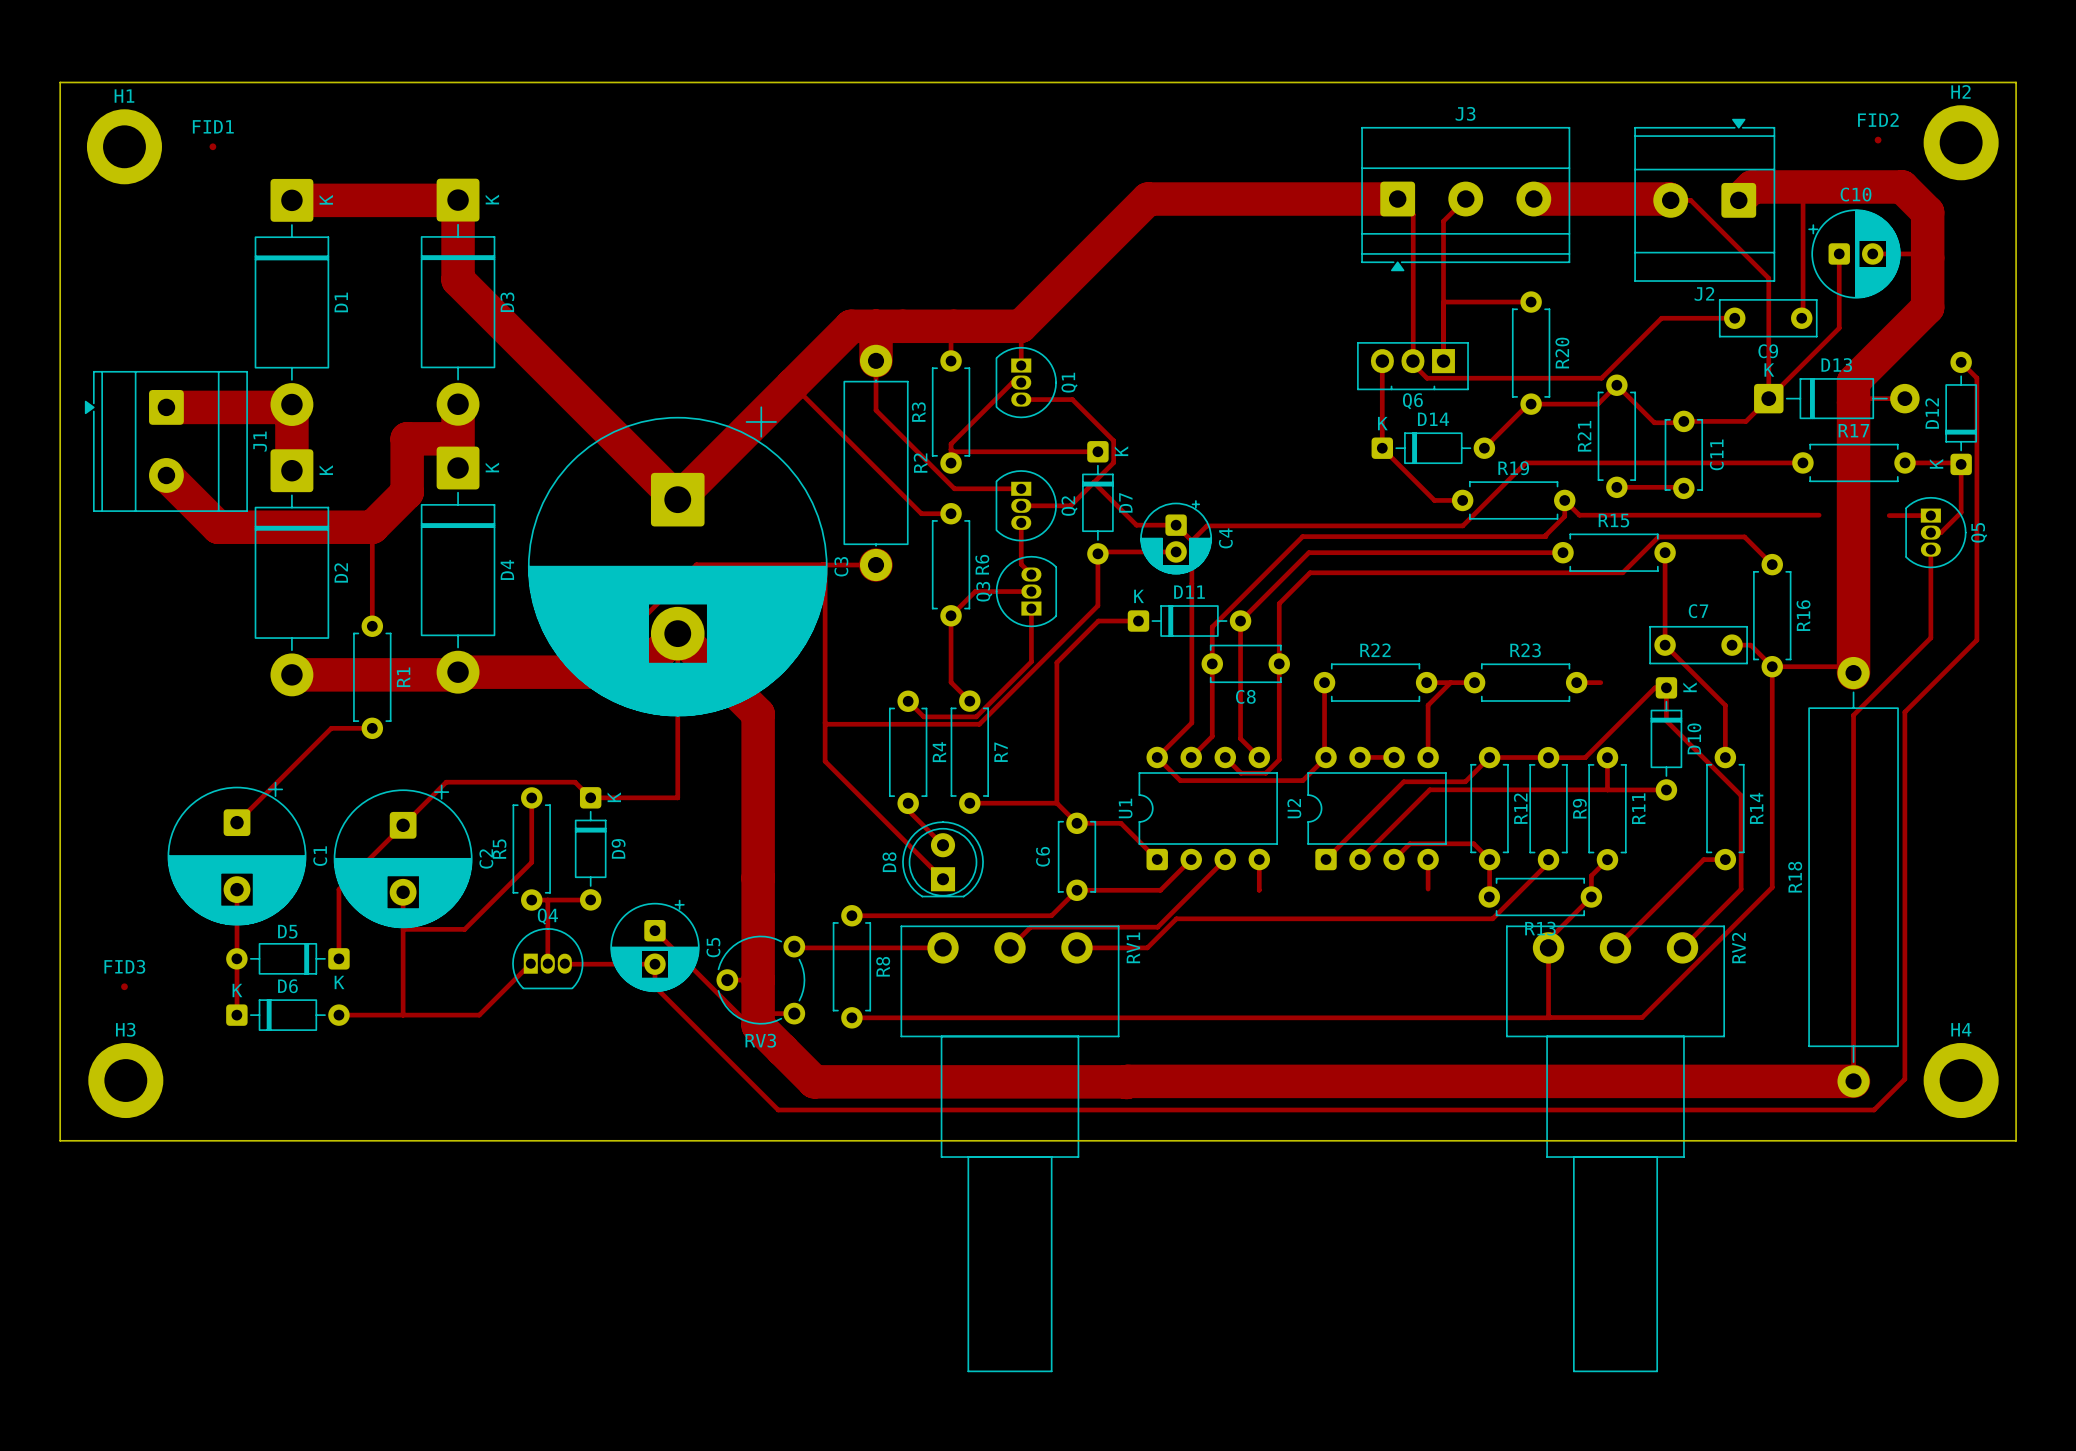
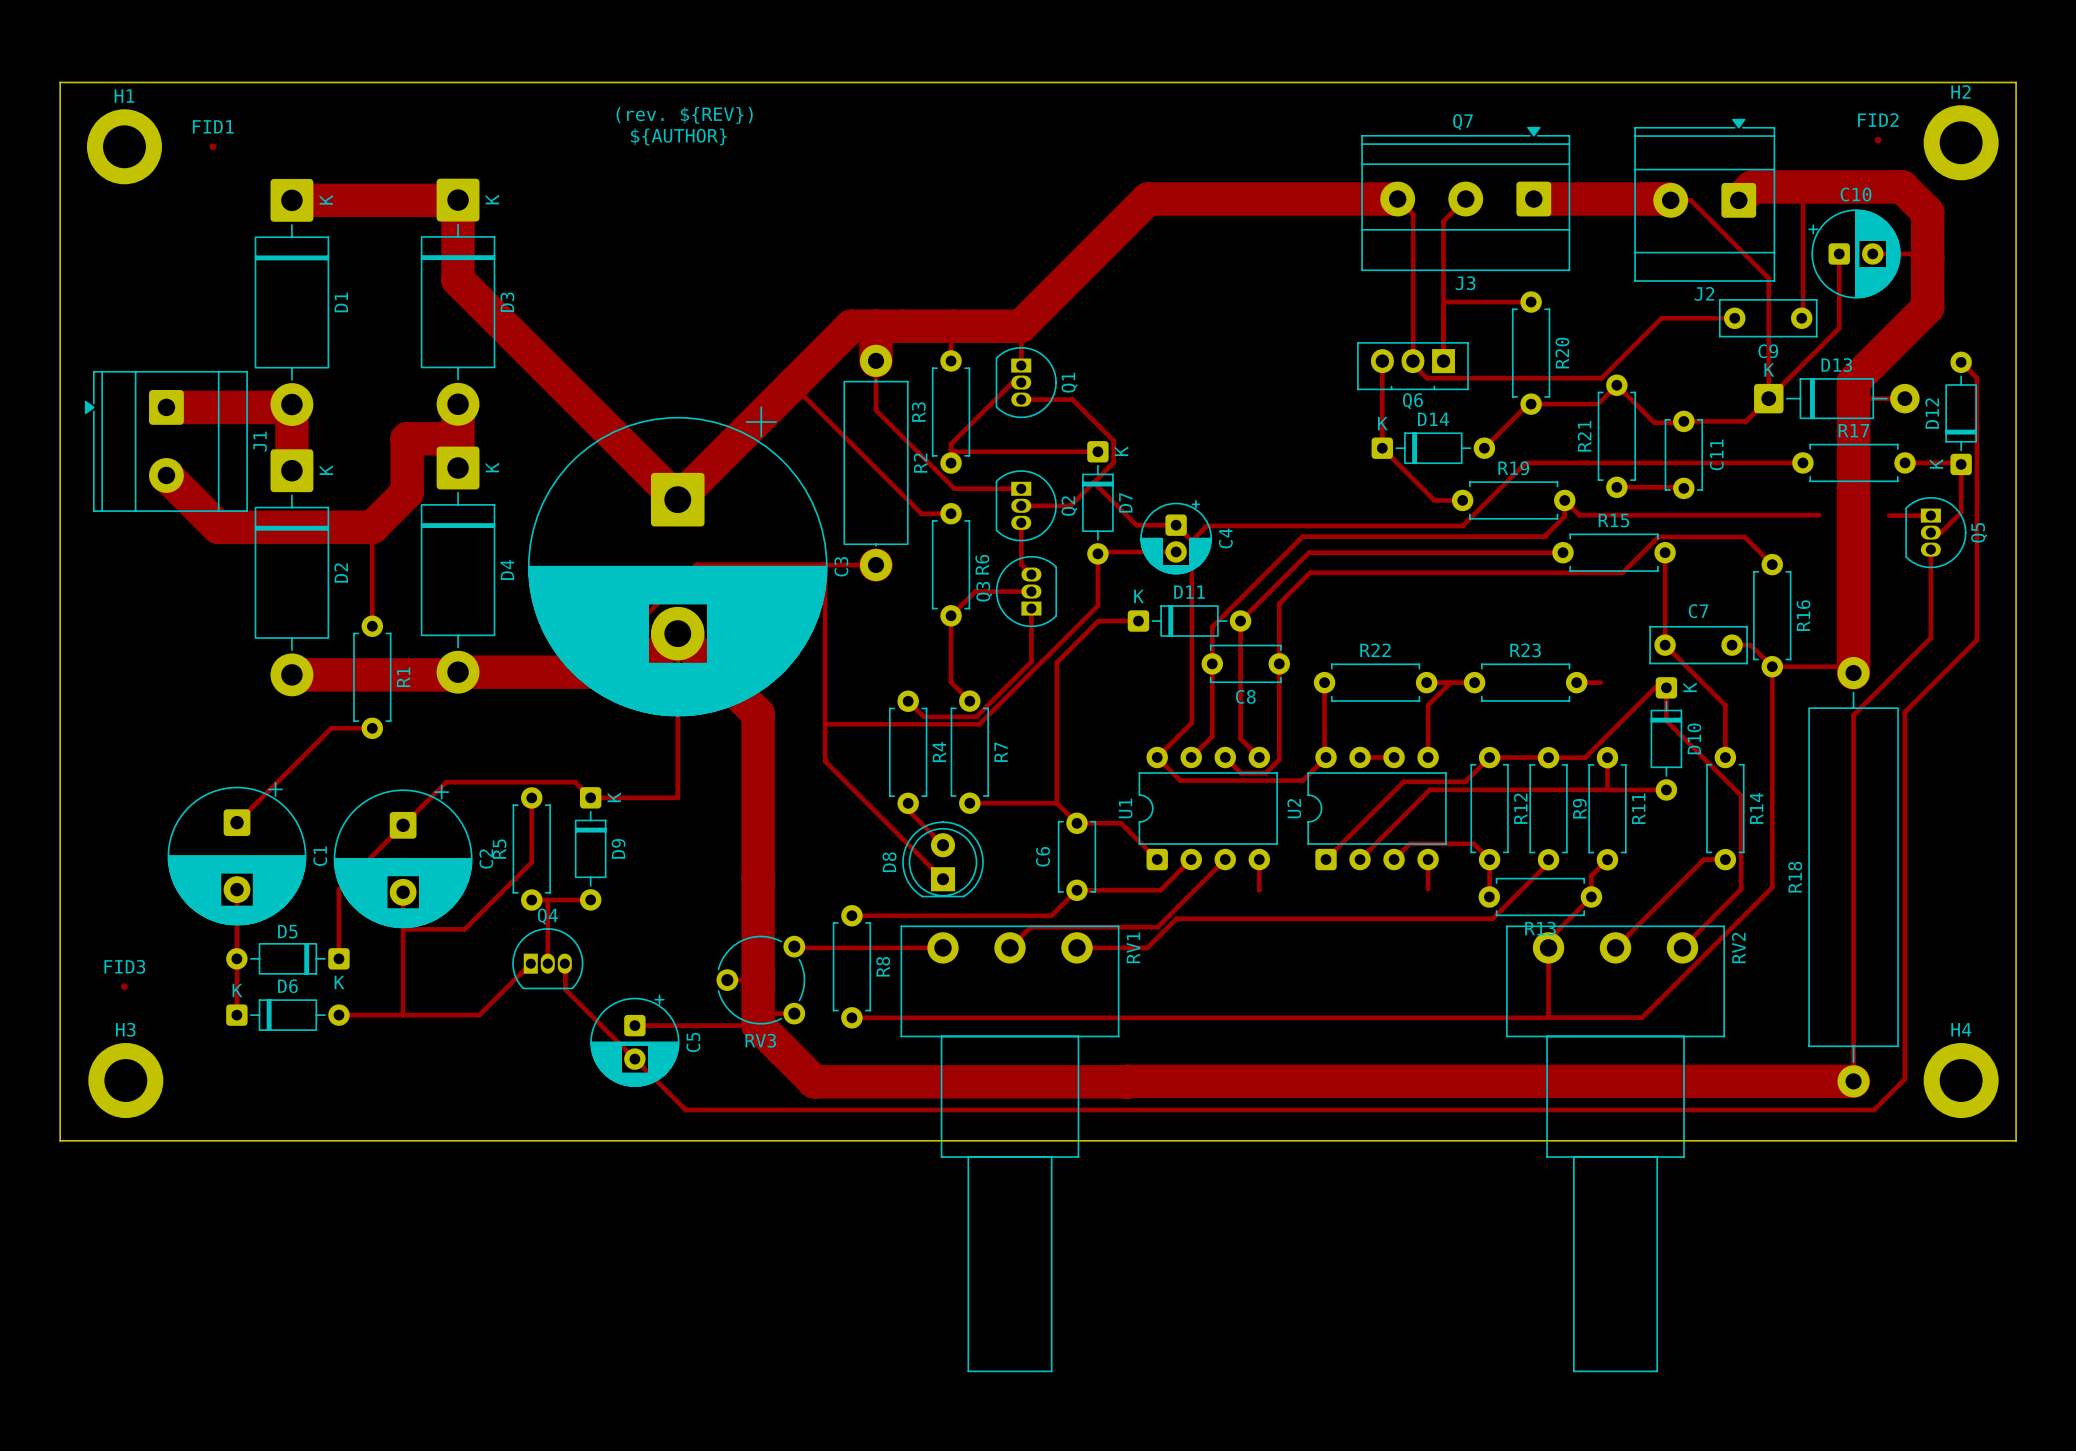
text: none -> (rev. ${REV}) (684, 115)
text: none -> Q7 (1462, 122)
text: none -> ${AUTHOR} (678, 136)
J3 rotation: 0° (1465, 199) -> 180° (1465, 198)
top track: (654, 930) (749, 1025) -> (634, 1025) (749, 1025)
C5 position: (654, 945) -> (634, 1040)
top track: (565, 964) (654, 964) (654, 986) (778, 1109) -> (565, 964) (565, 989) (685, 1109) (778, 1109)

